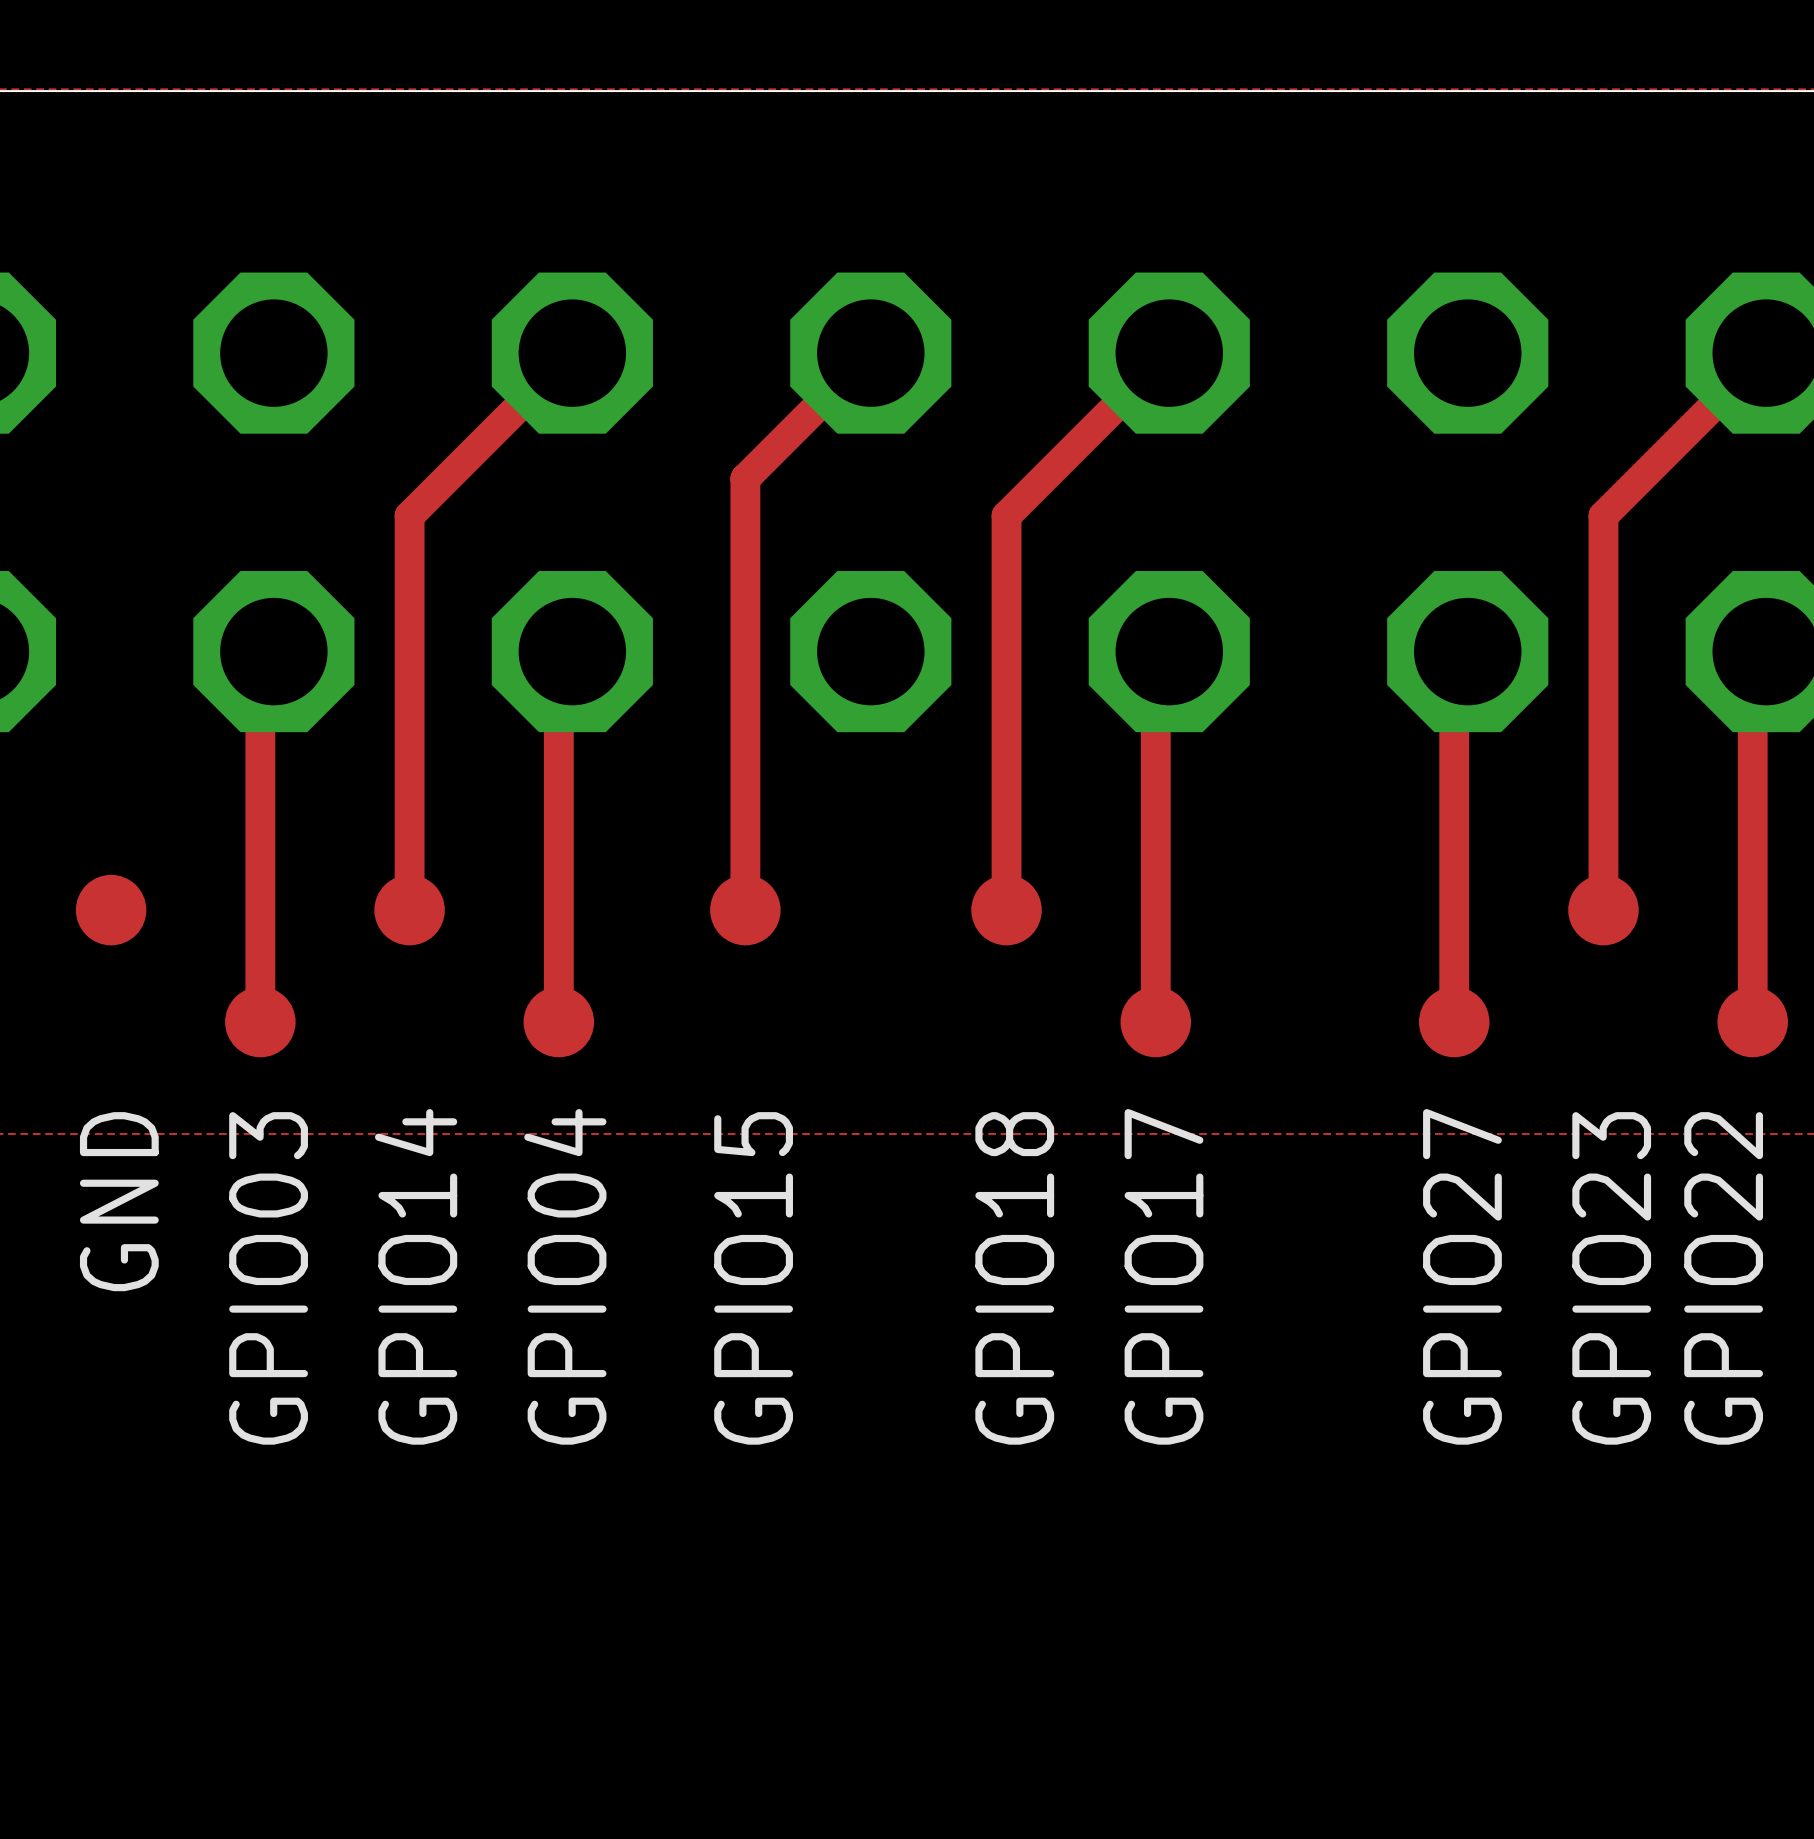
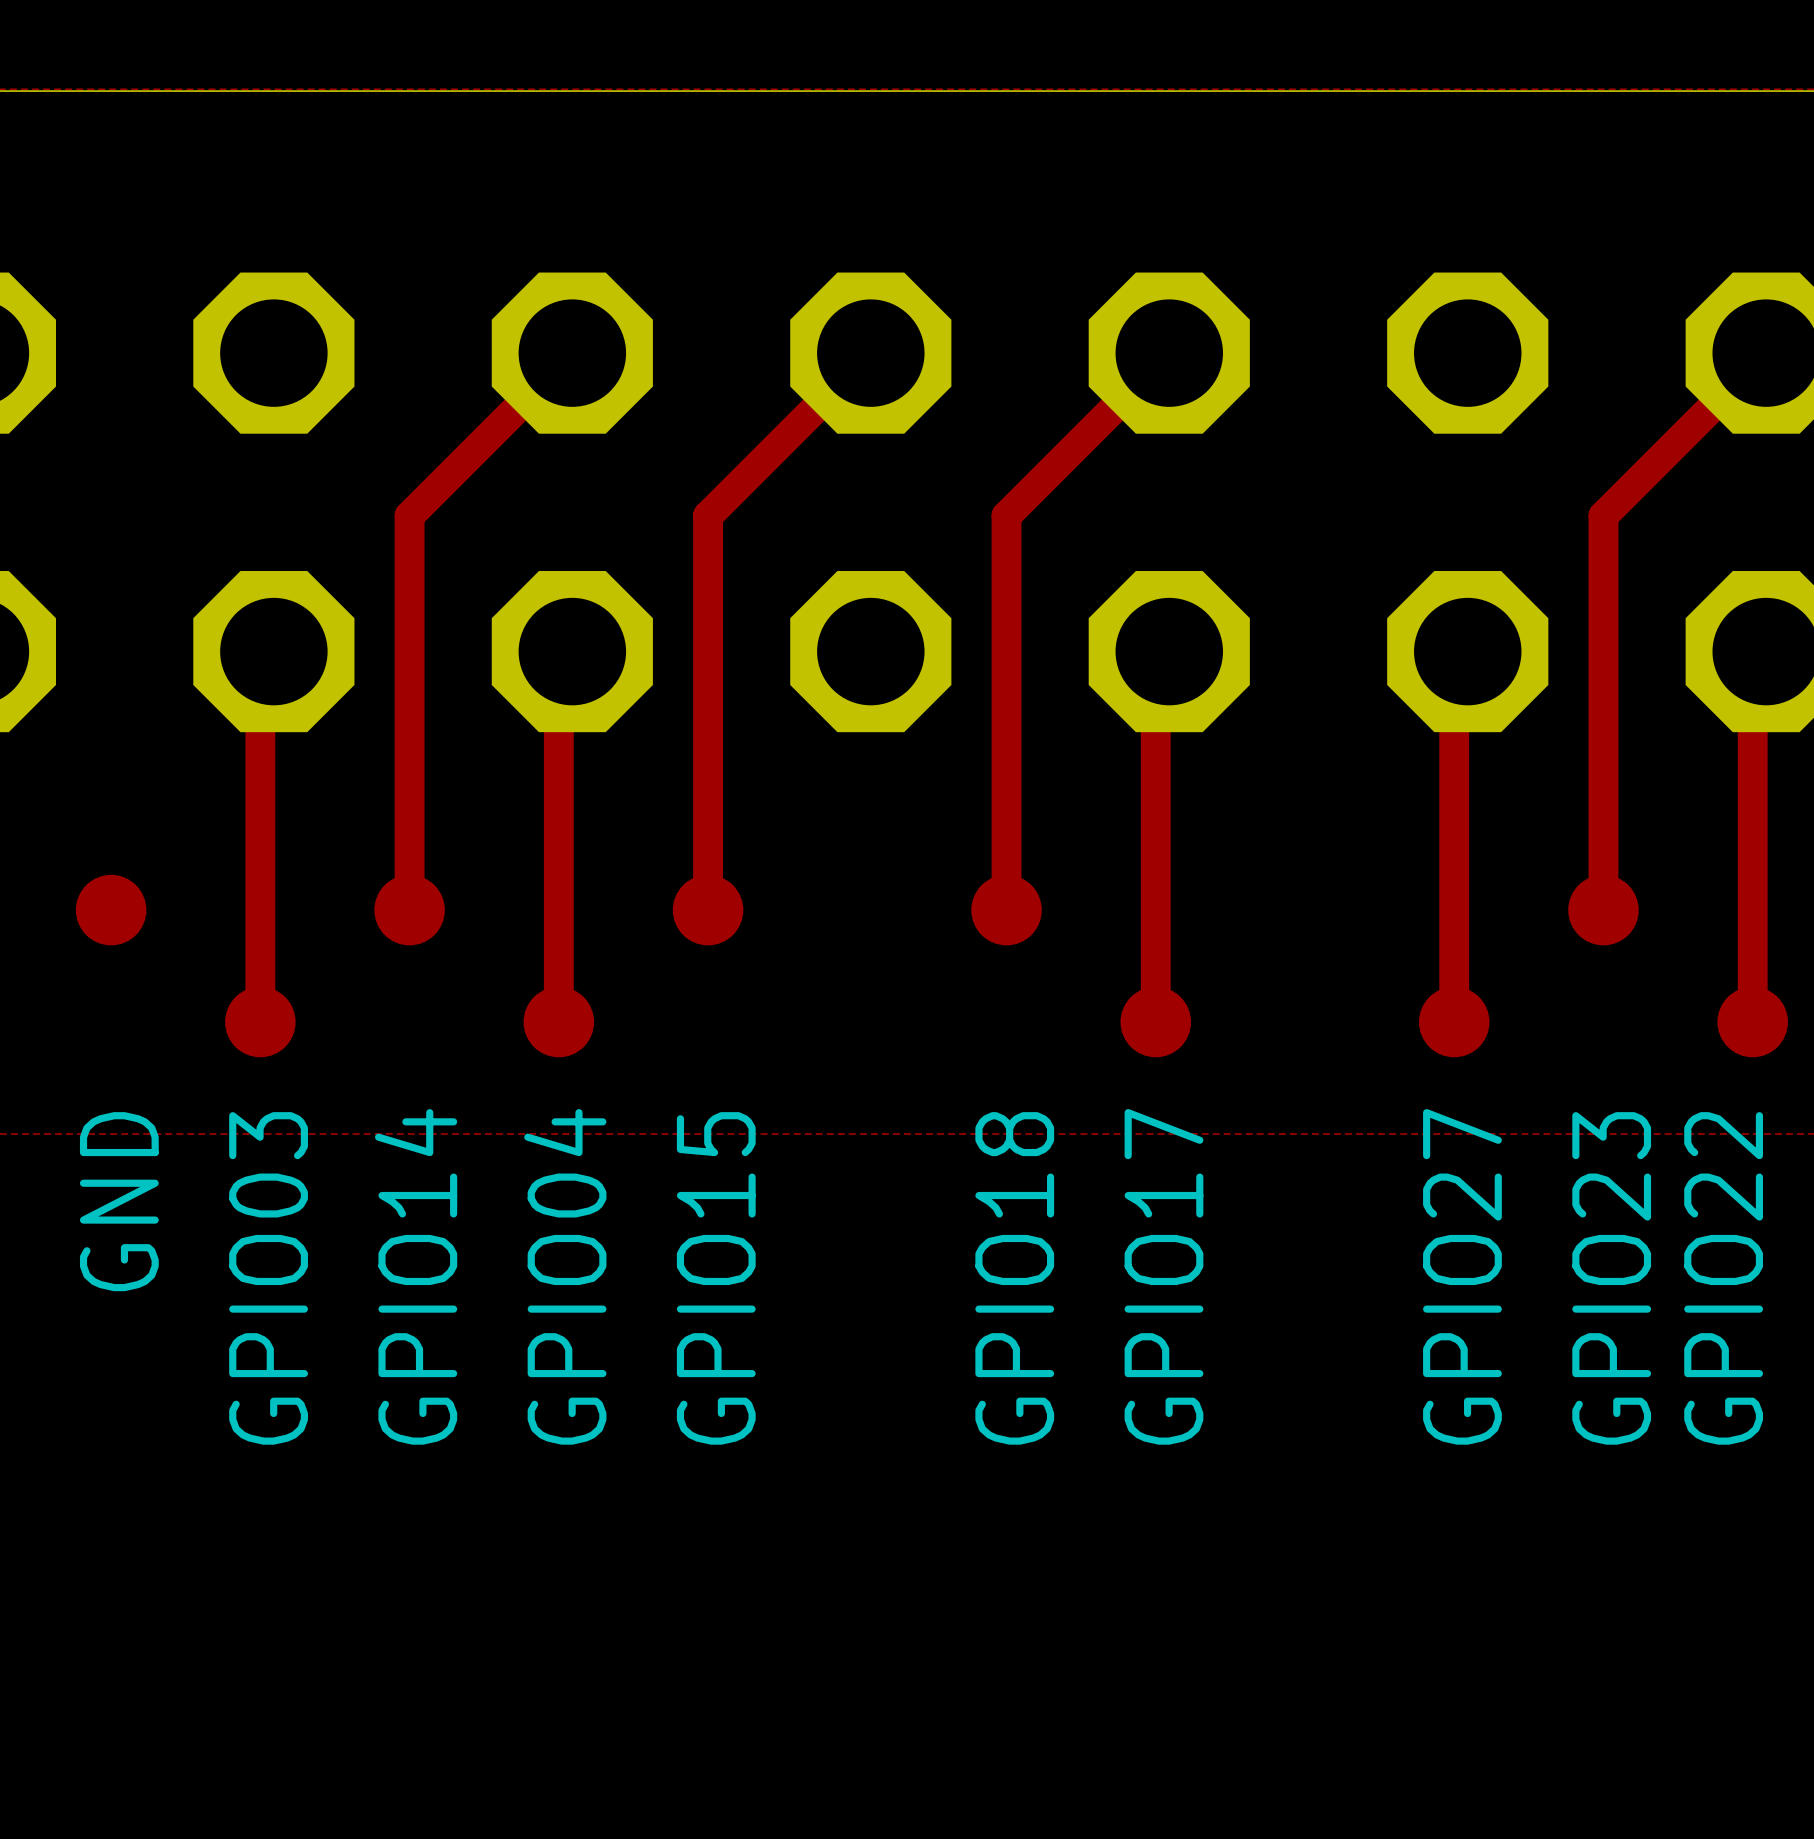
track: (745, 478) (745, 910) -> (745, 478) (708, 515) (708, 910)
GPIO15 position: (745, 910) -> (708, 910)

